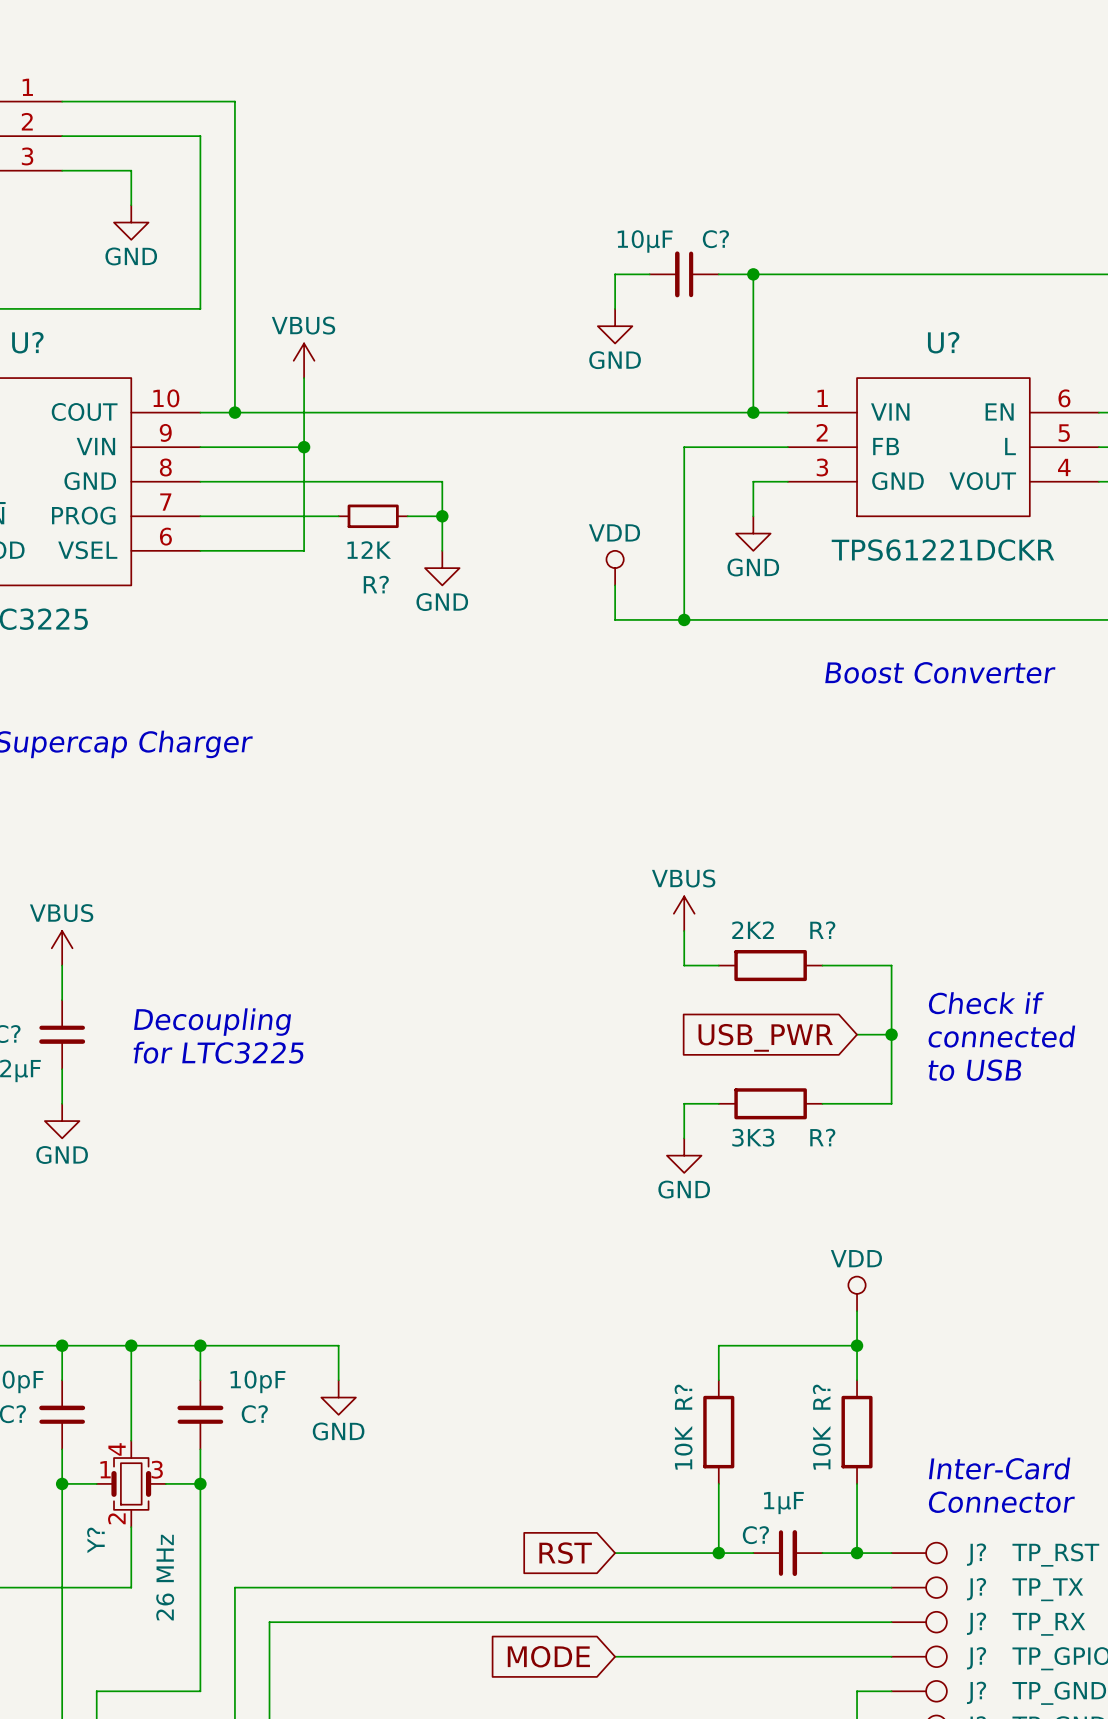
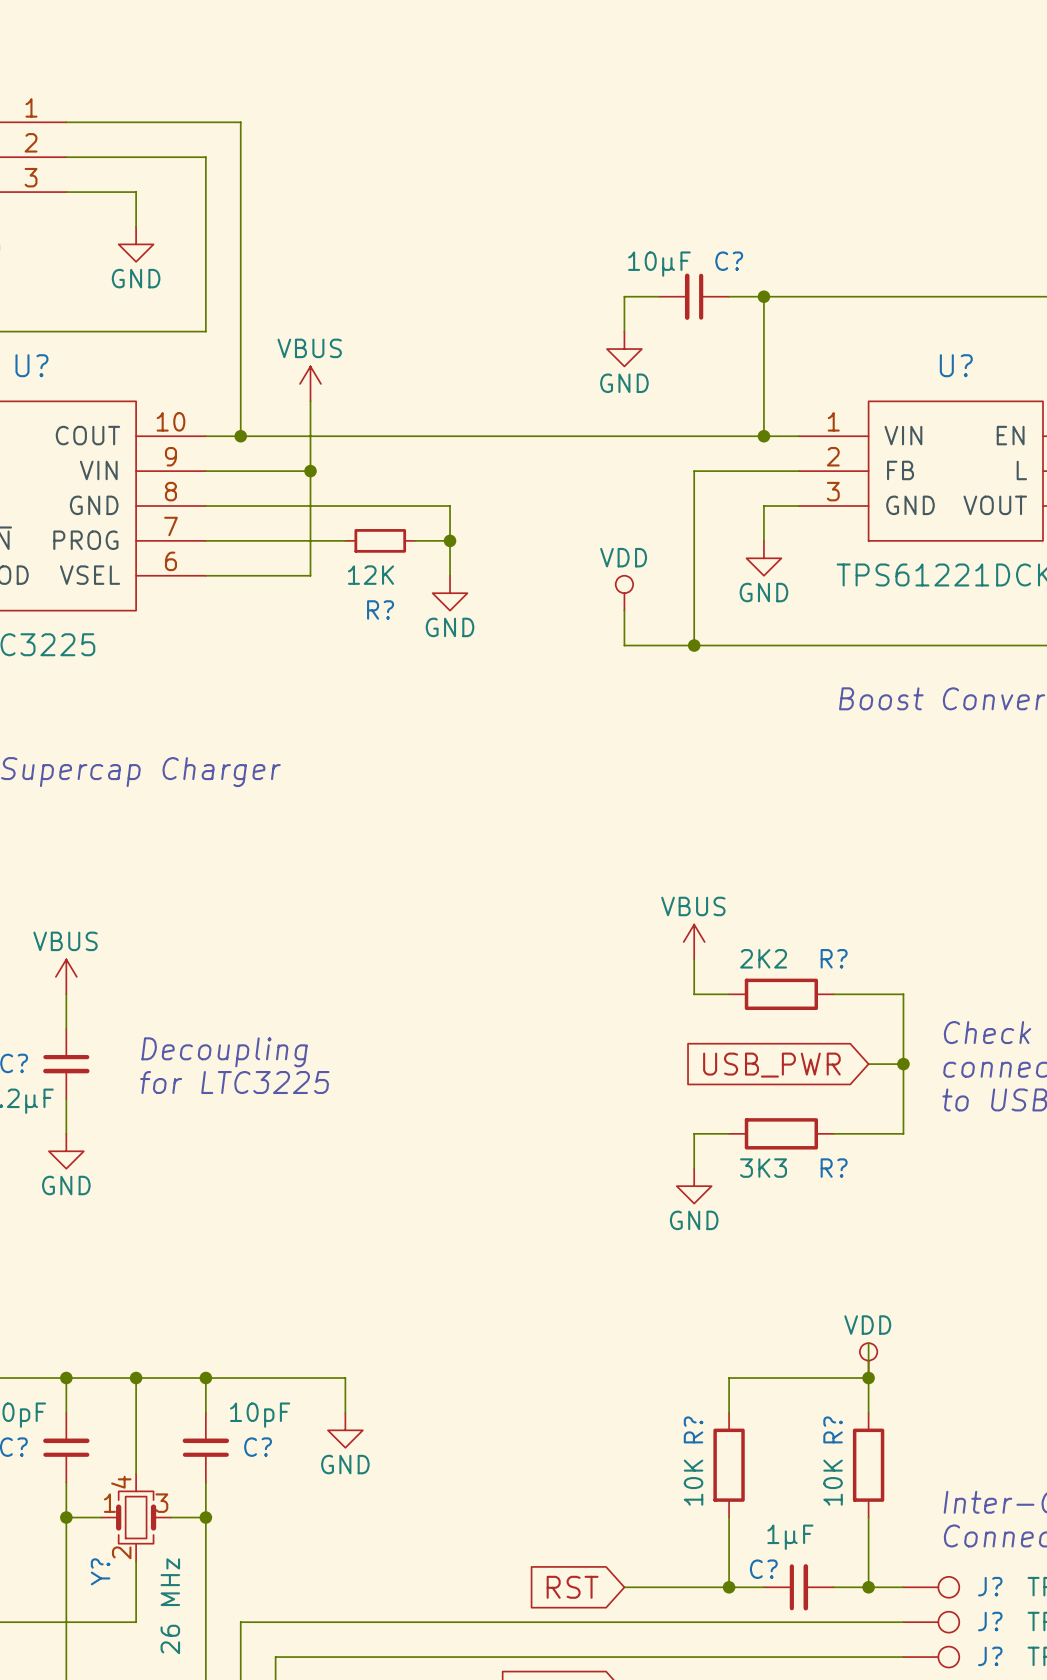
power symbol position: VDD (857, 1293) -> VDD (868, 1360)

